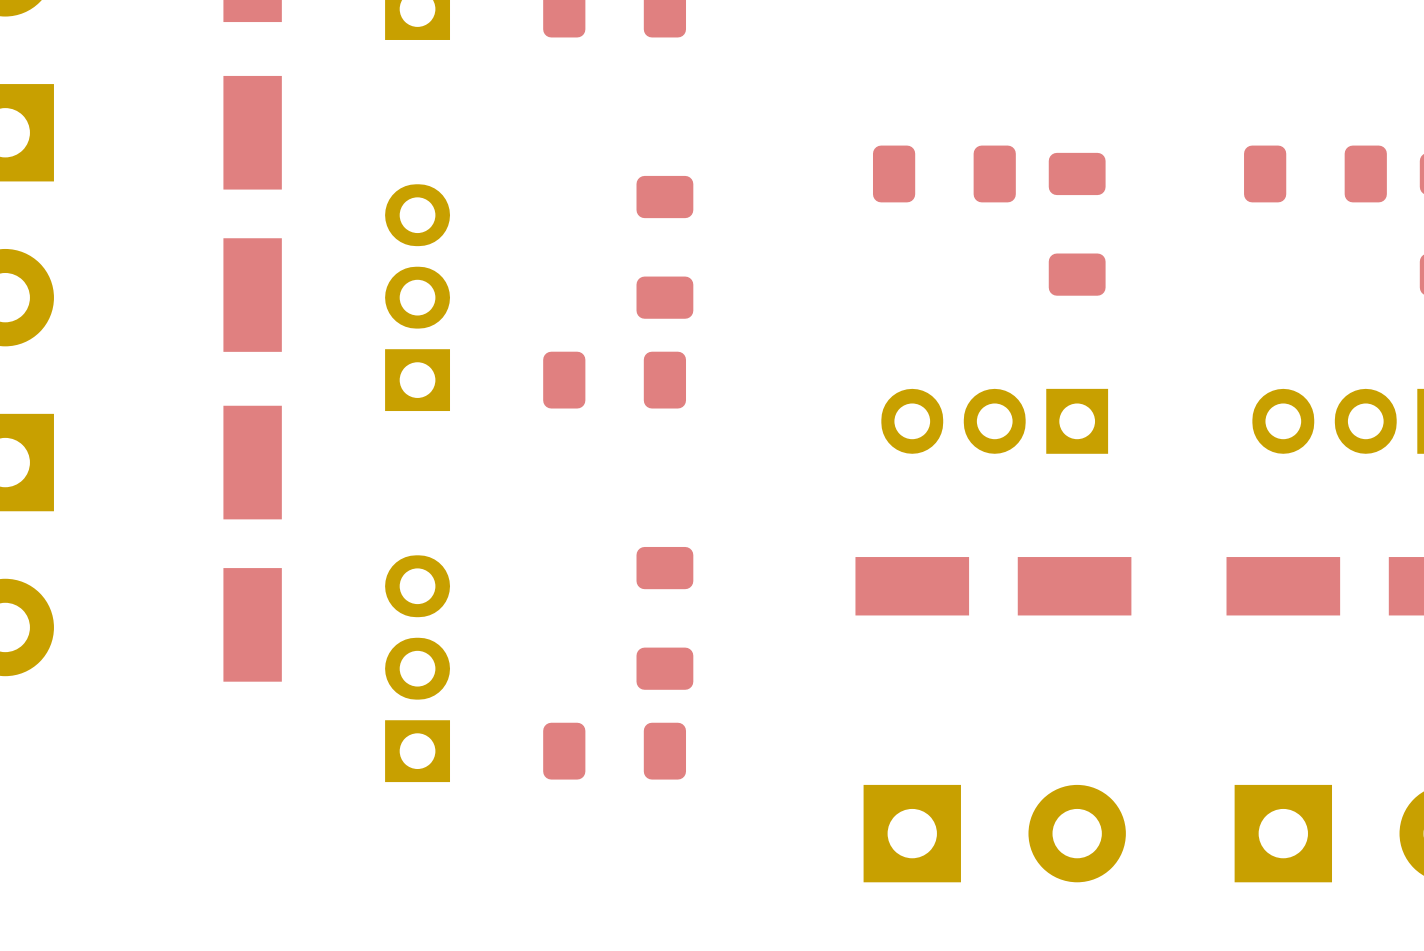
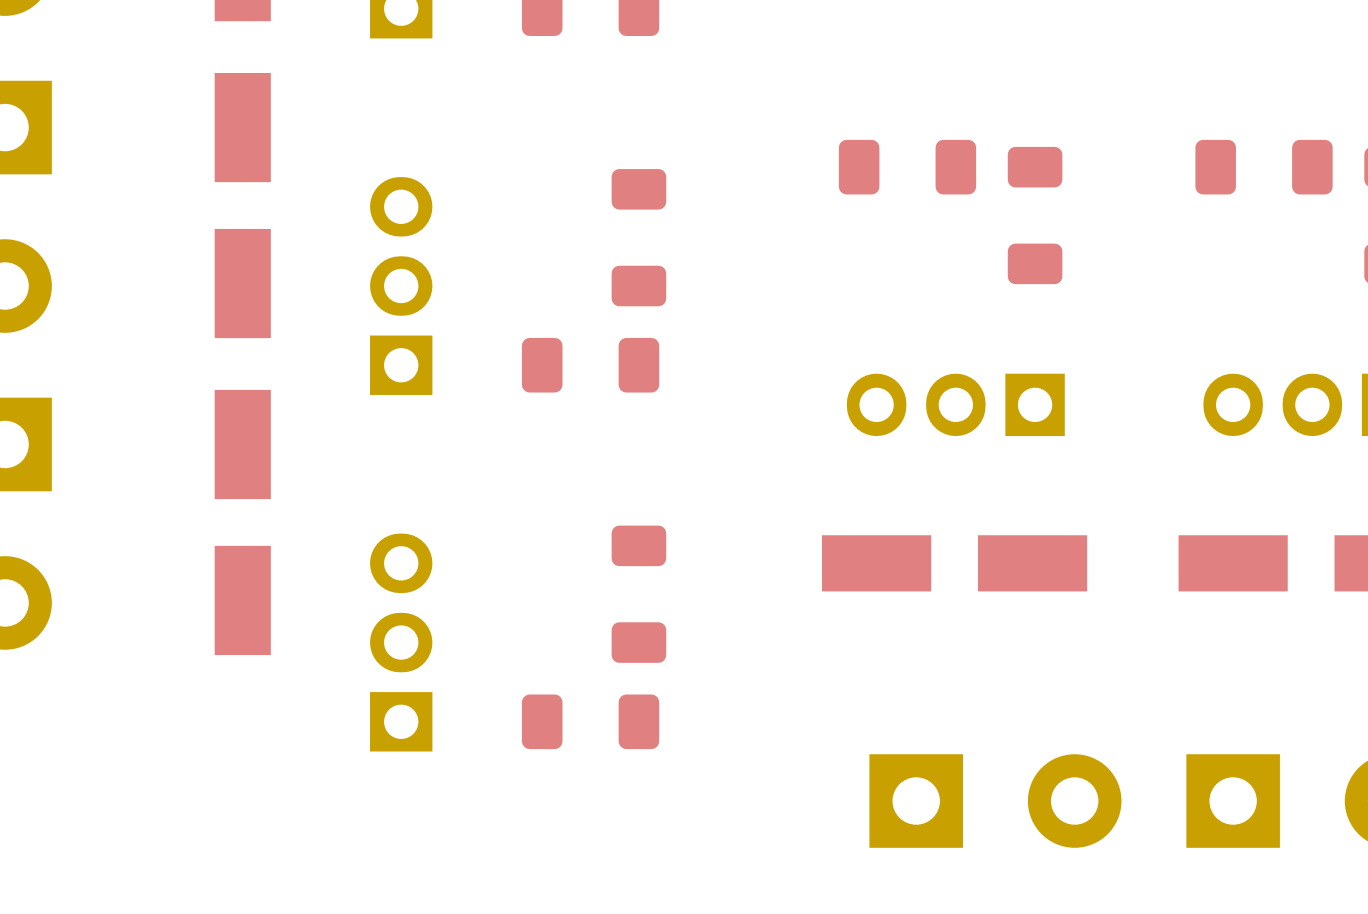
part position: (994, 833) -> (995, 801)

